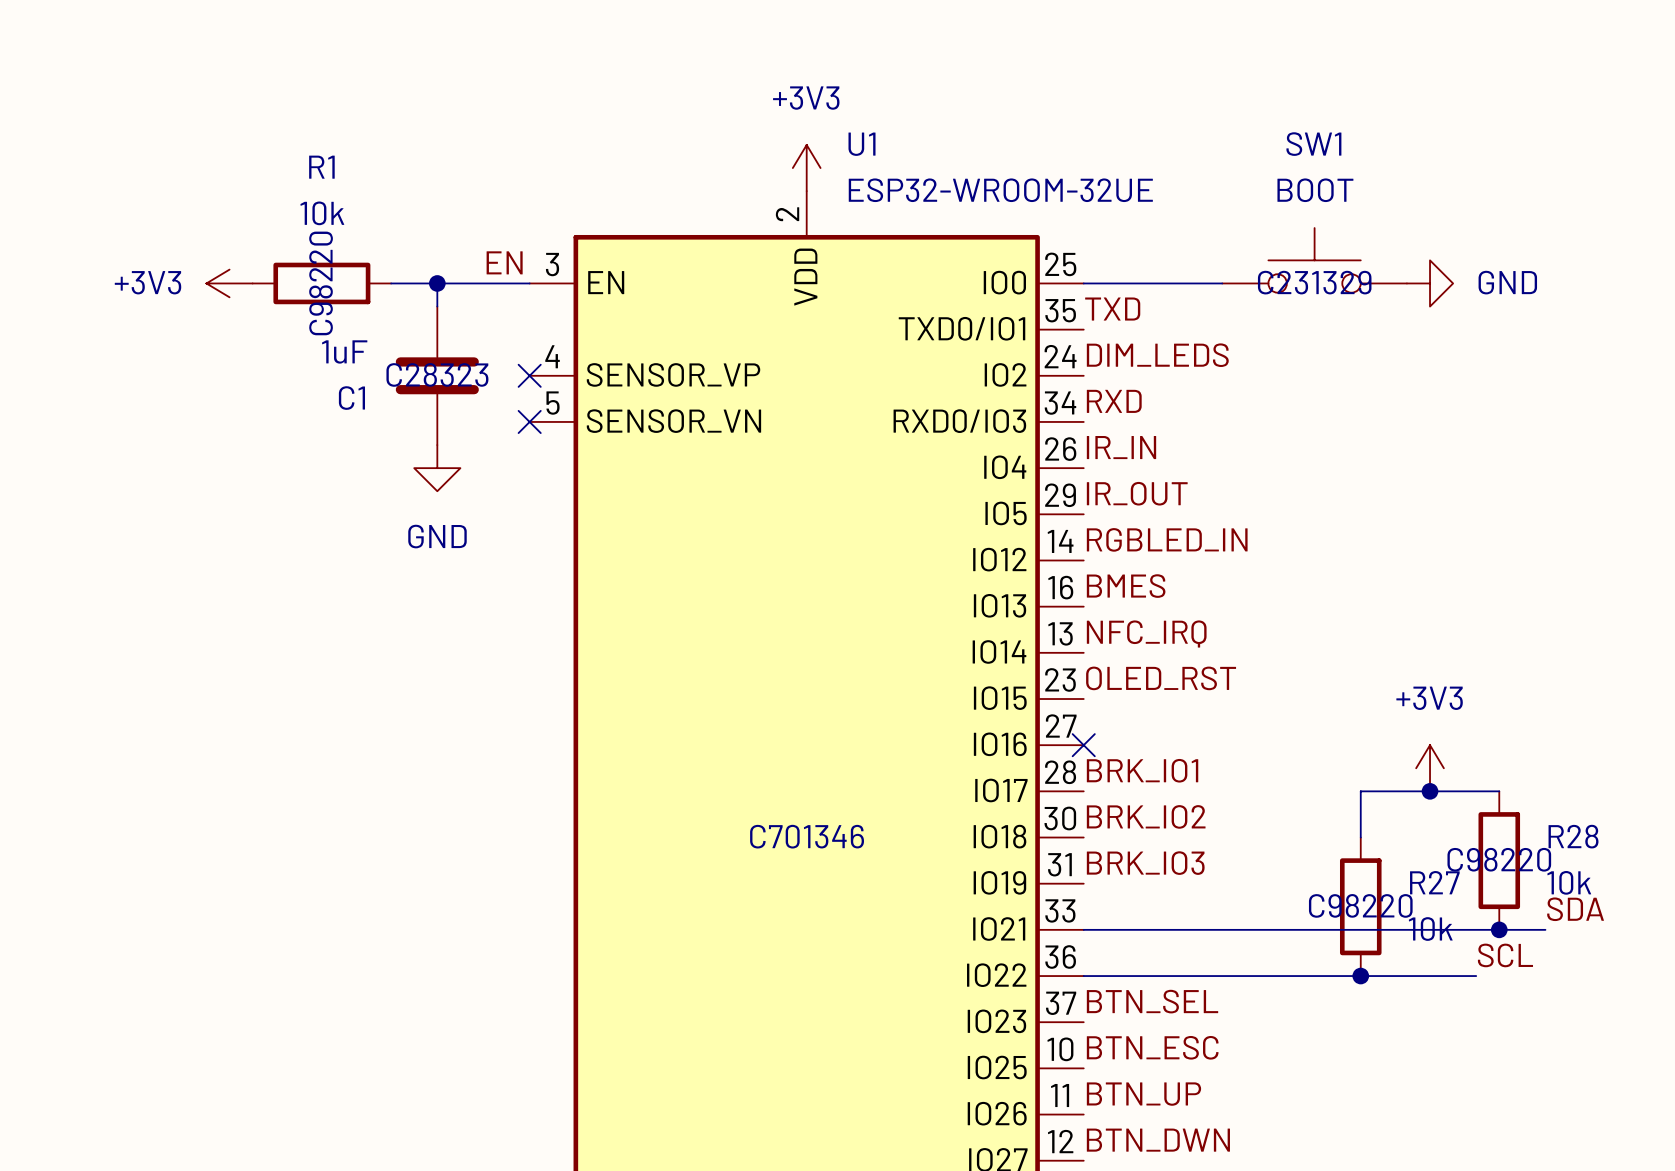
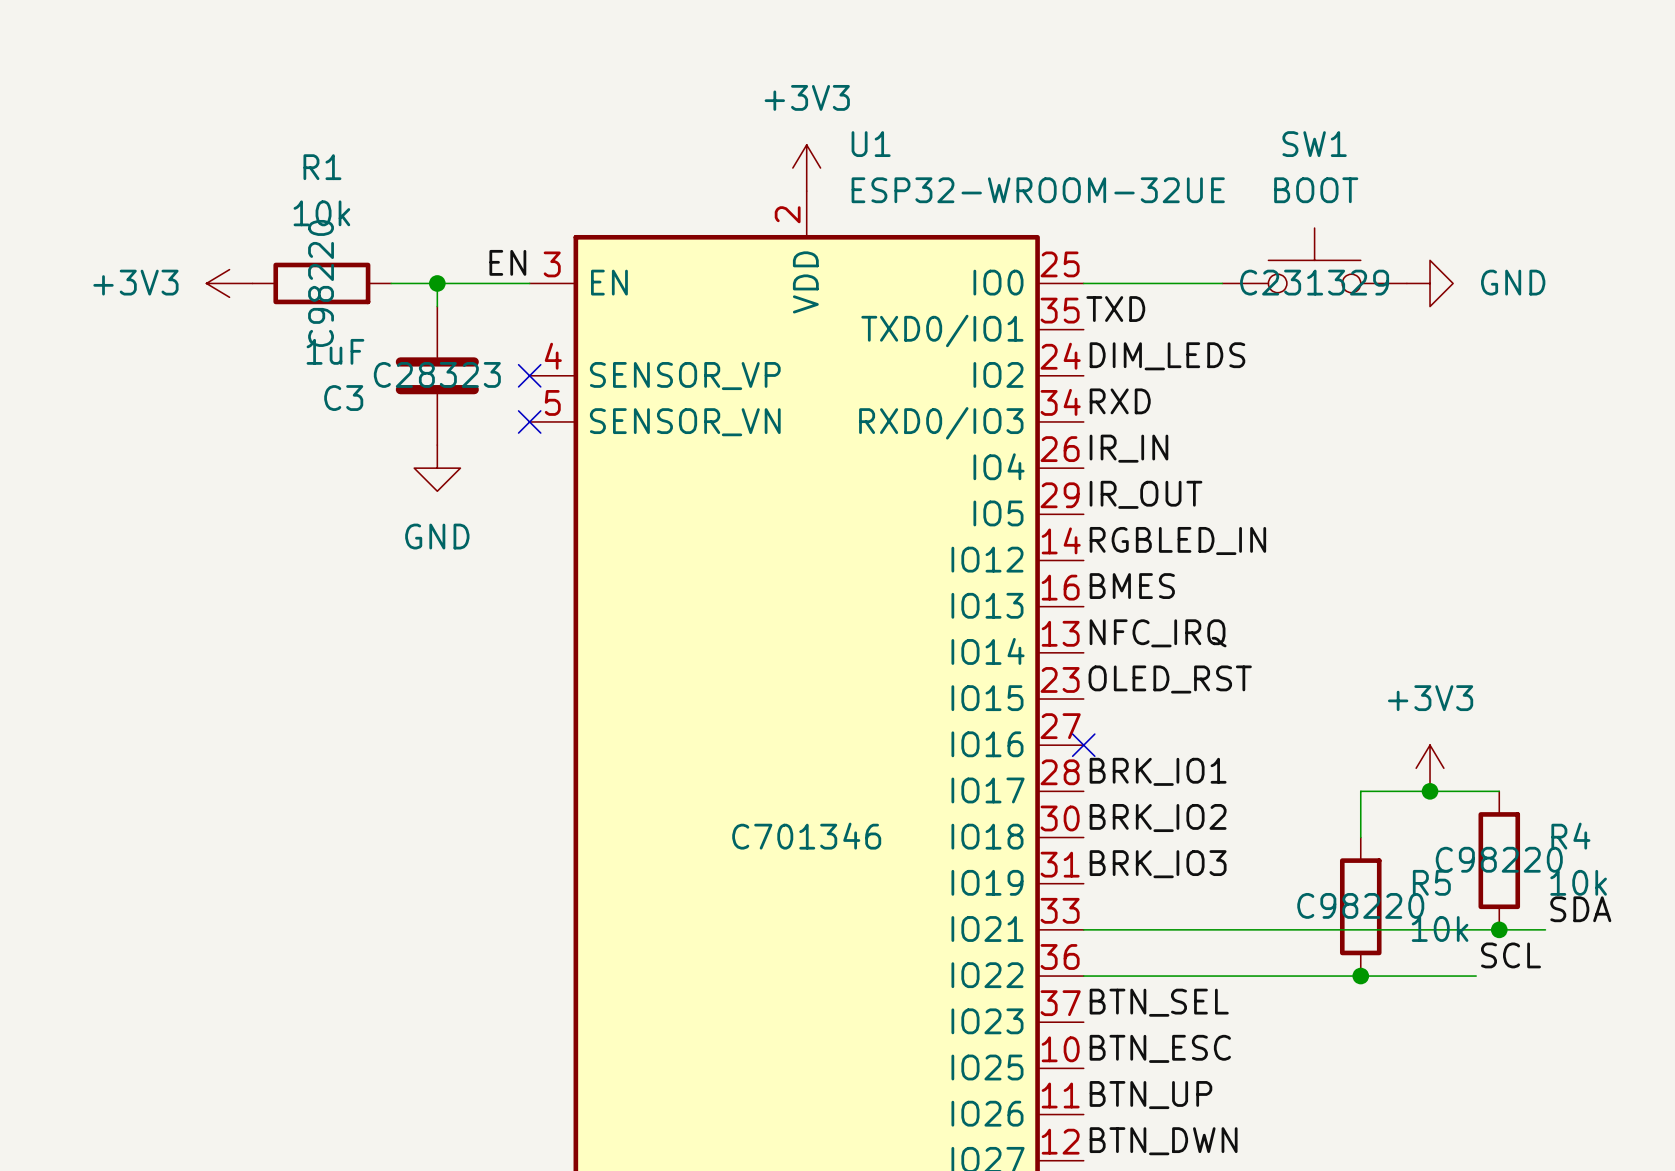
C1 name: C1 (351, 398) -> C3 (343, 398)
R28 name: R28 (1573, 836) -> R4 (1570, 836)
R27 name: R27 (1434, 882) -> R5 (1431, 882)

